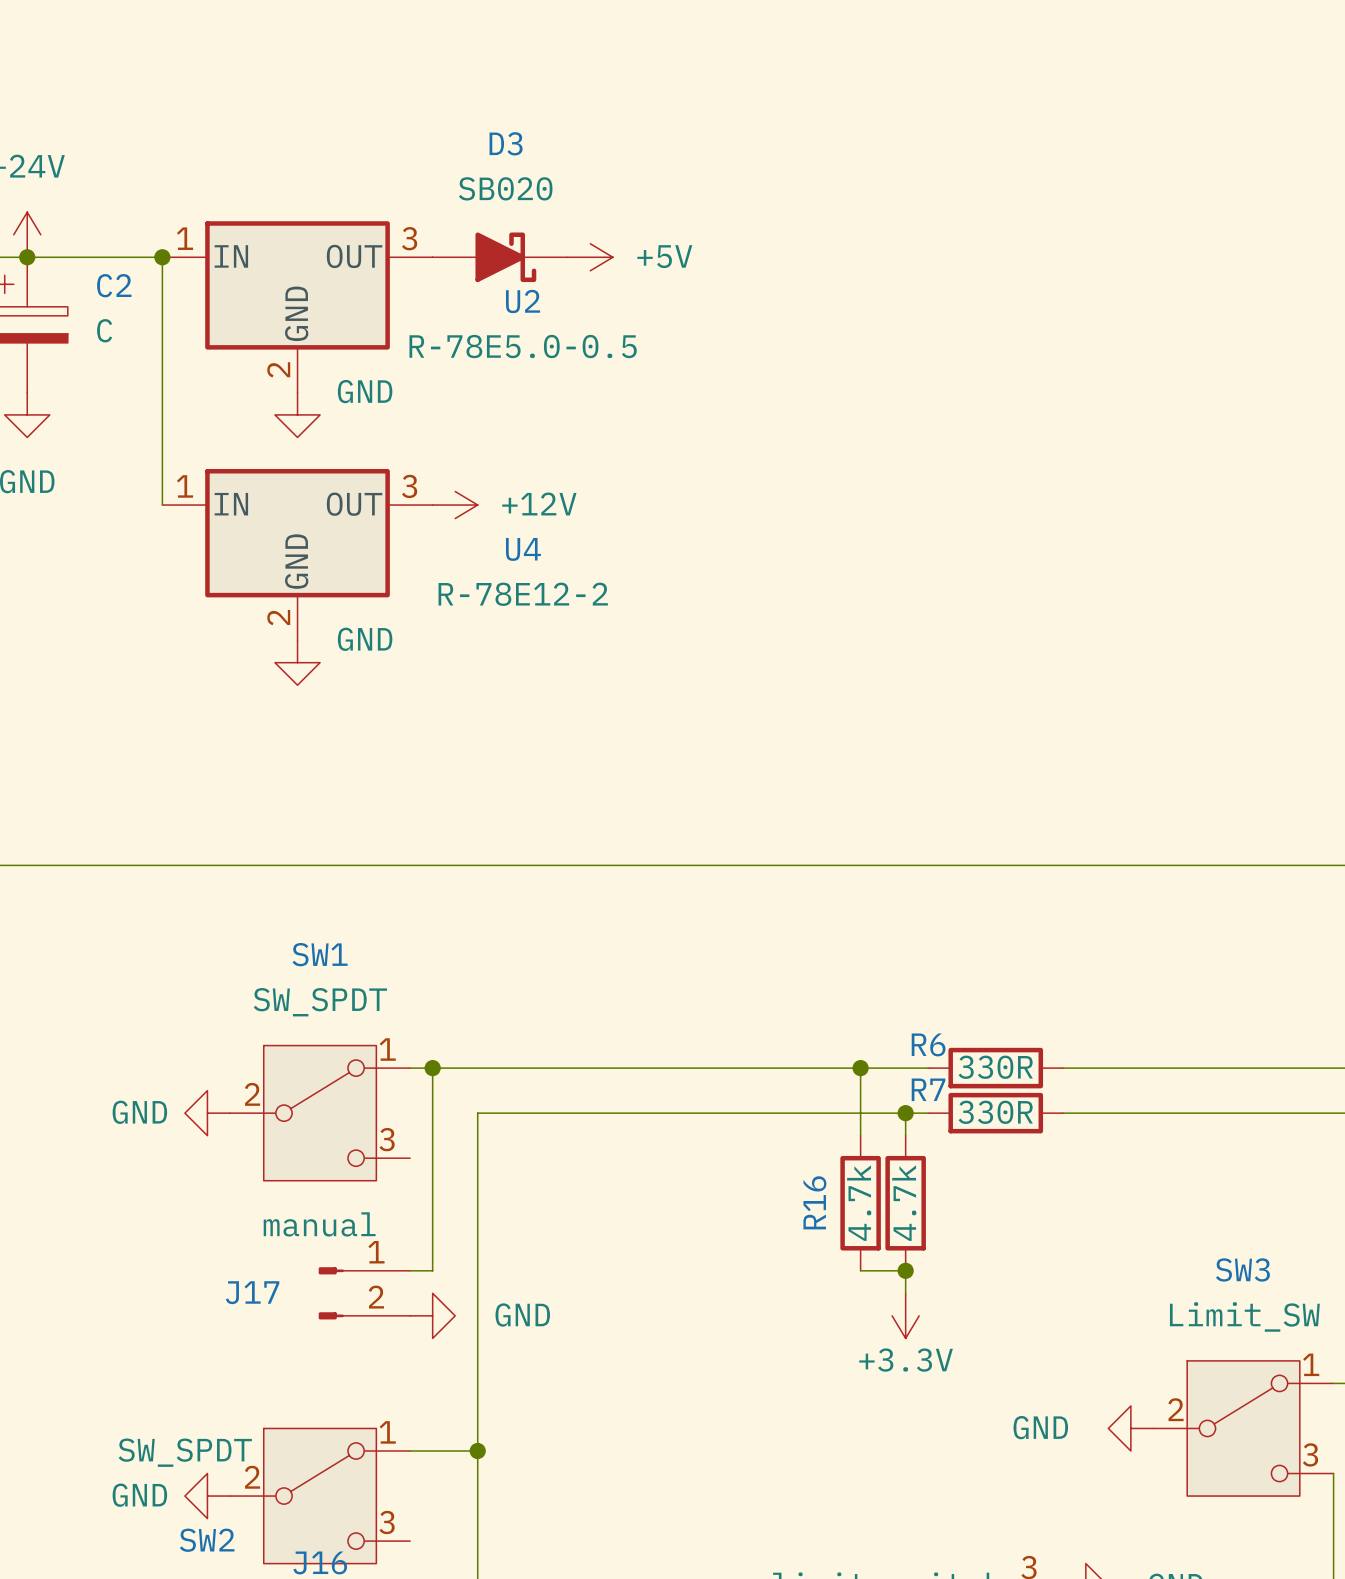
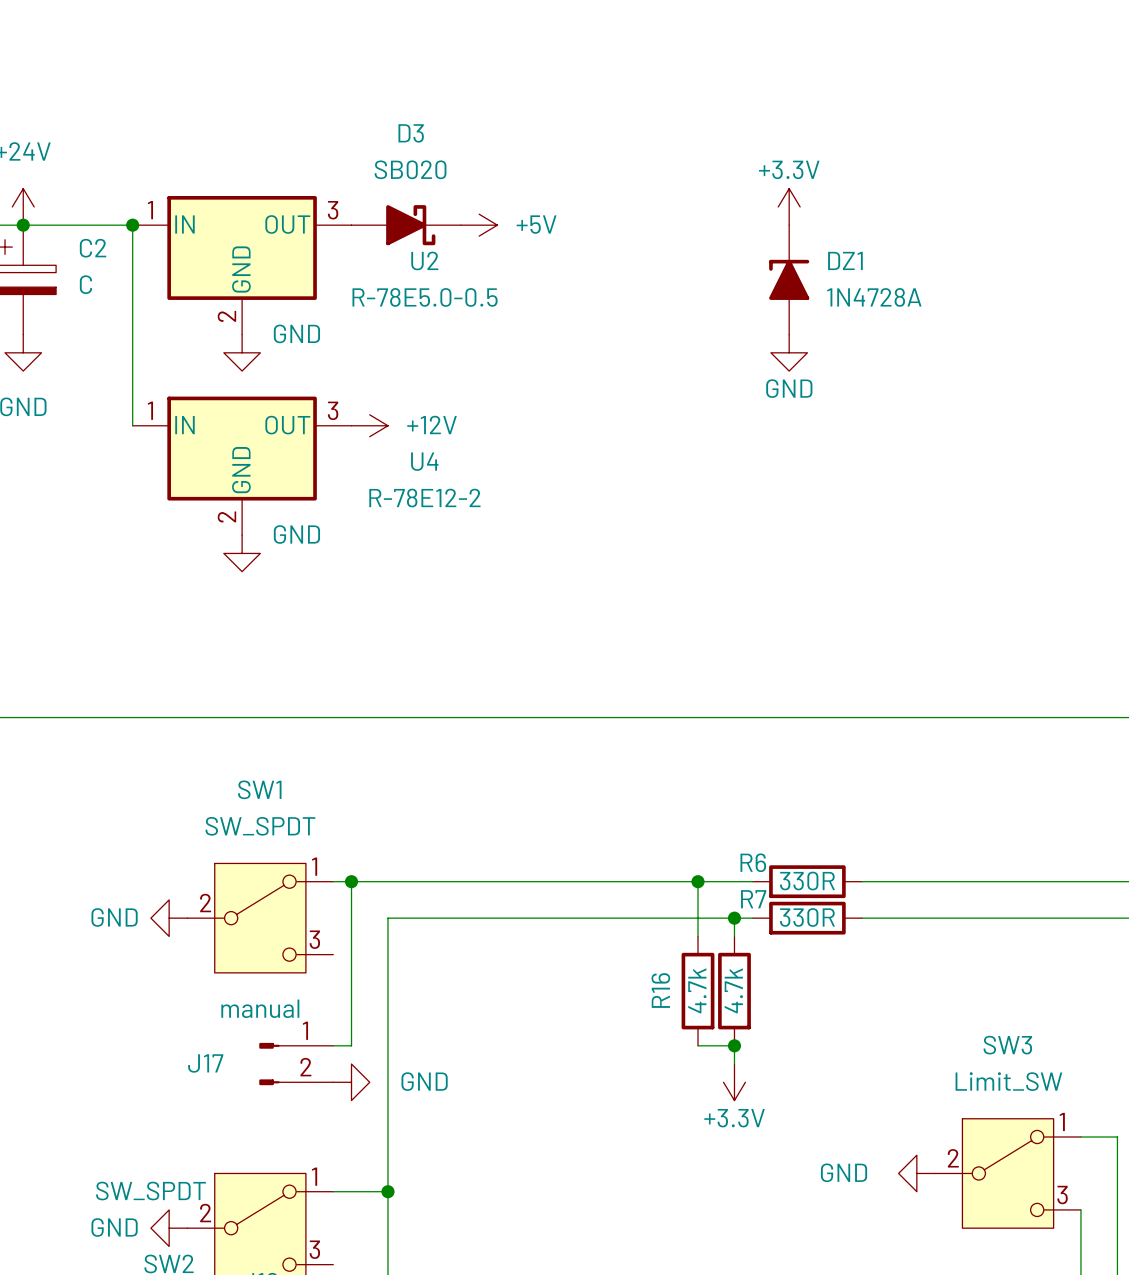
power symbol: none -> +3.3V (789, 206)
DZ1: none -> 1N4728A (789, 279)
power symbol: none -> GND (789, 352)

